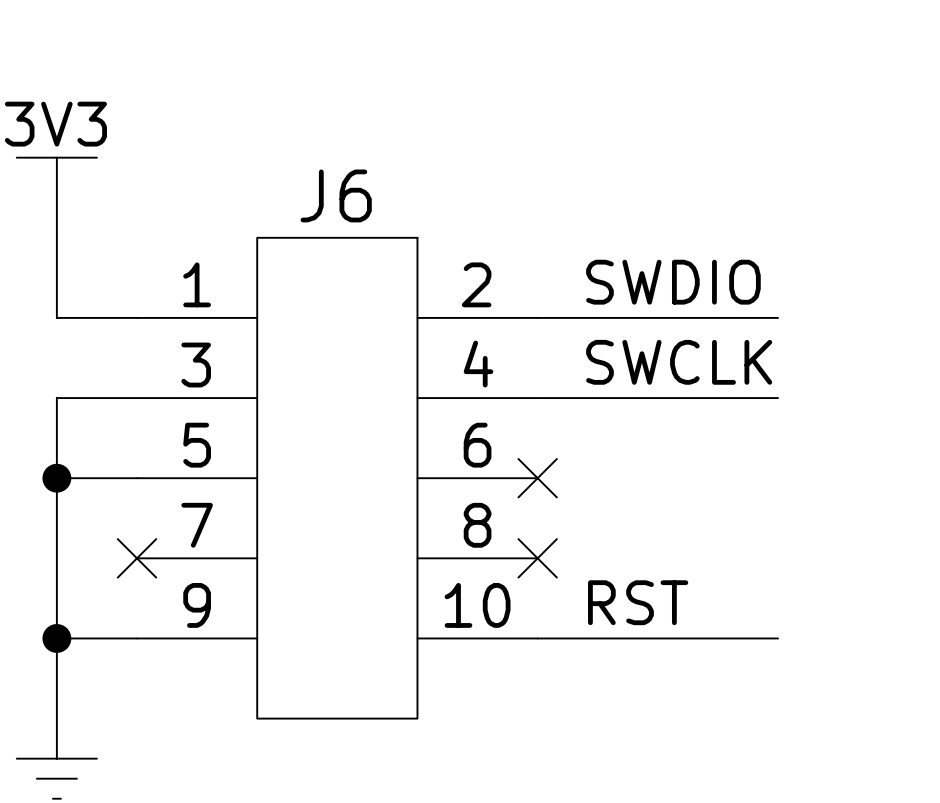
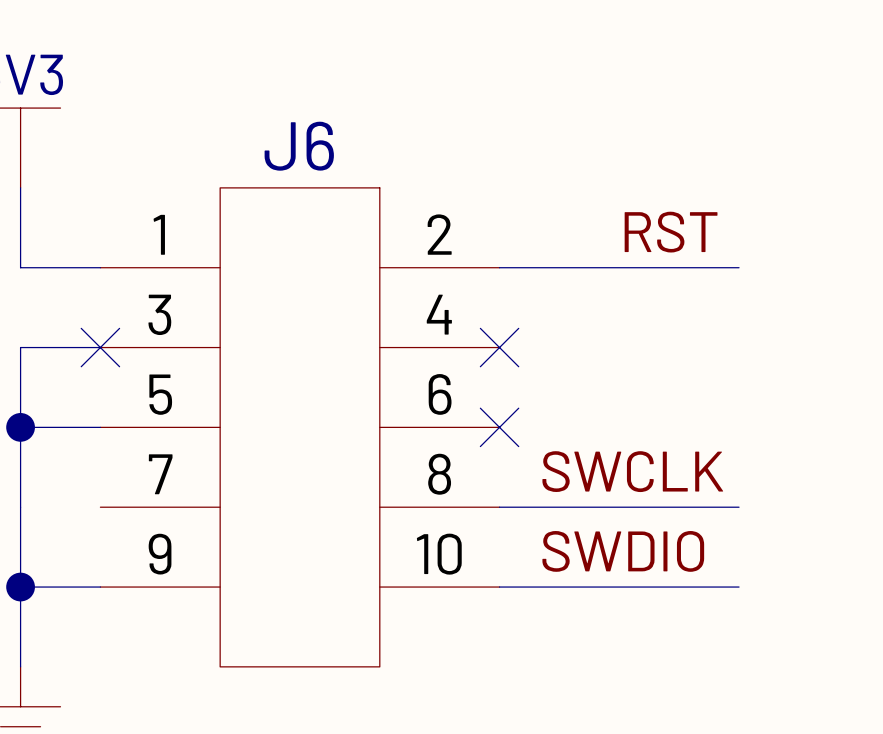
label: SWDIO (673, 282) -> none
label: none -> RST (671, 232)
label position: SWCLK (679, 362) -> SWCLK (632, 471)
wire: (537, 398) (778, 398) -> (499, 507) (739, 507)
no-connect mark position: (137, 558) -> (100, 347)
no-connect mark position: (537, 558) -> (499, 347)
label: RST (638, 602) -> SWDIO (623, 551)

